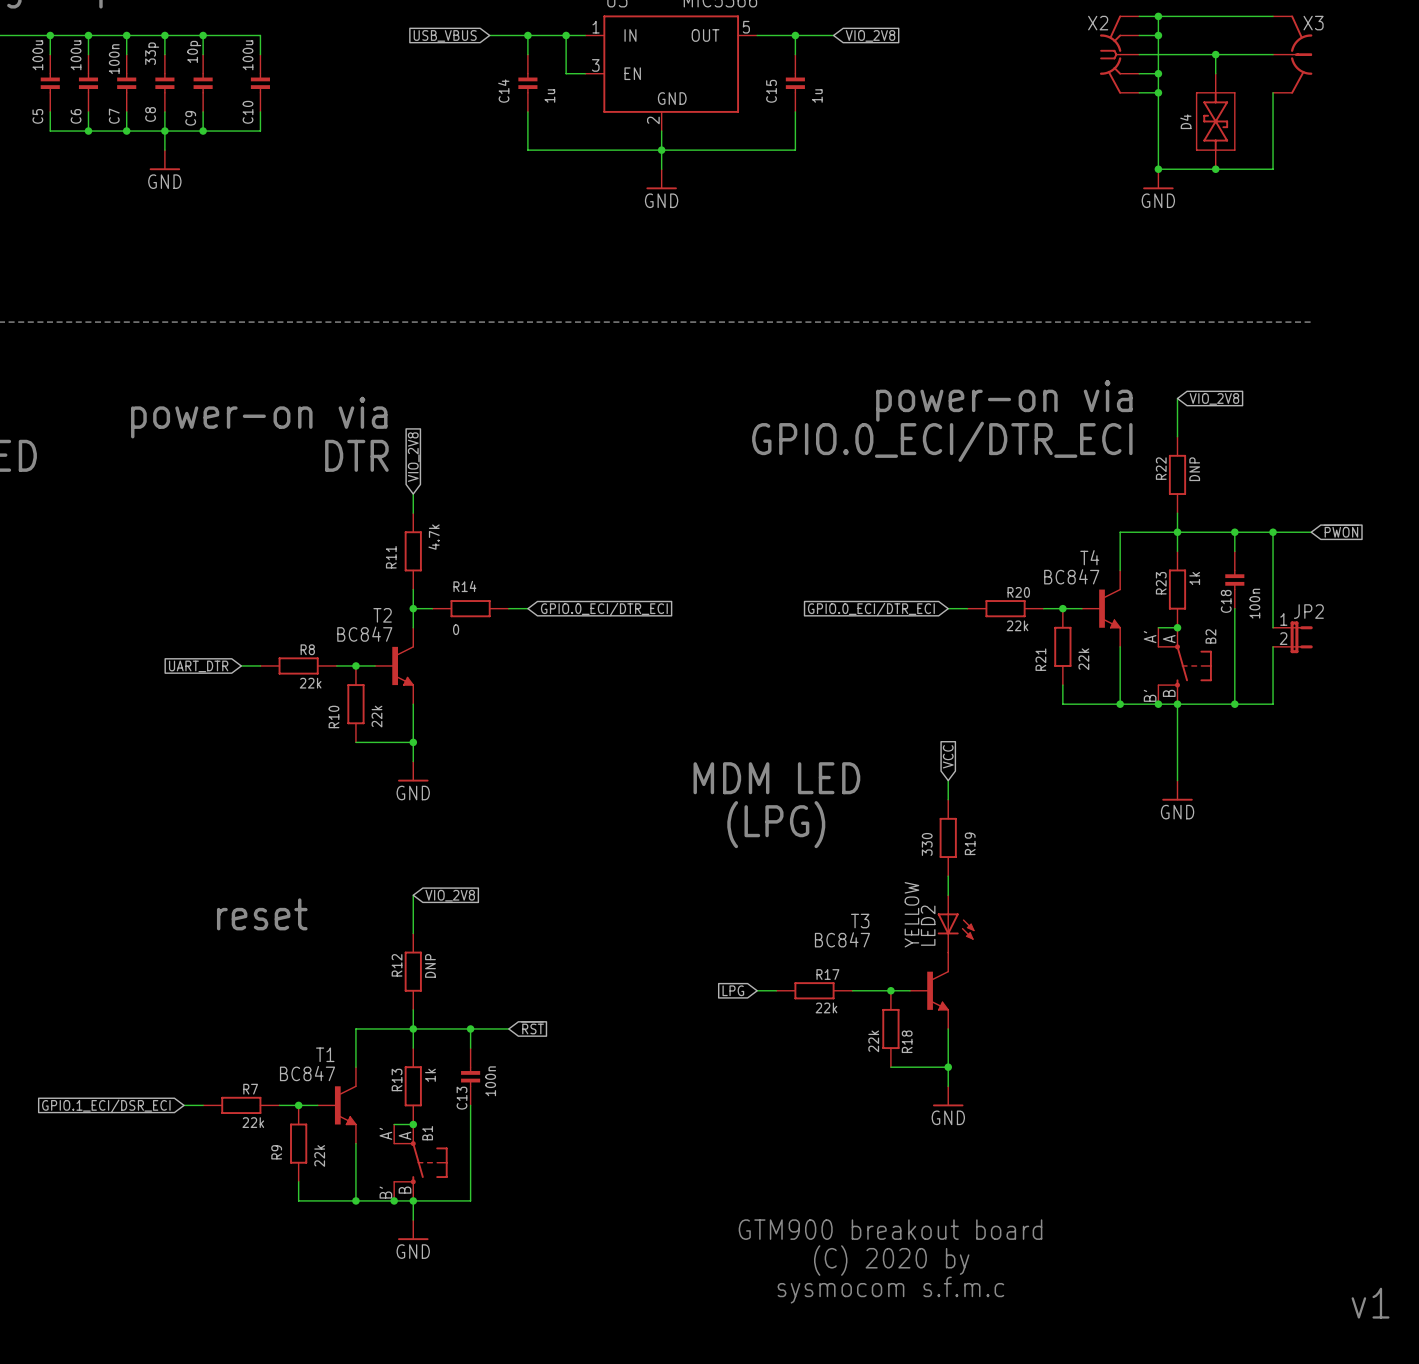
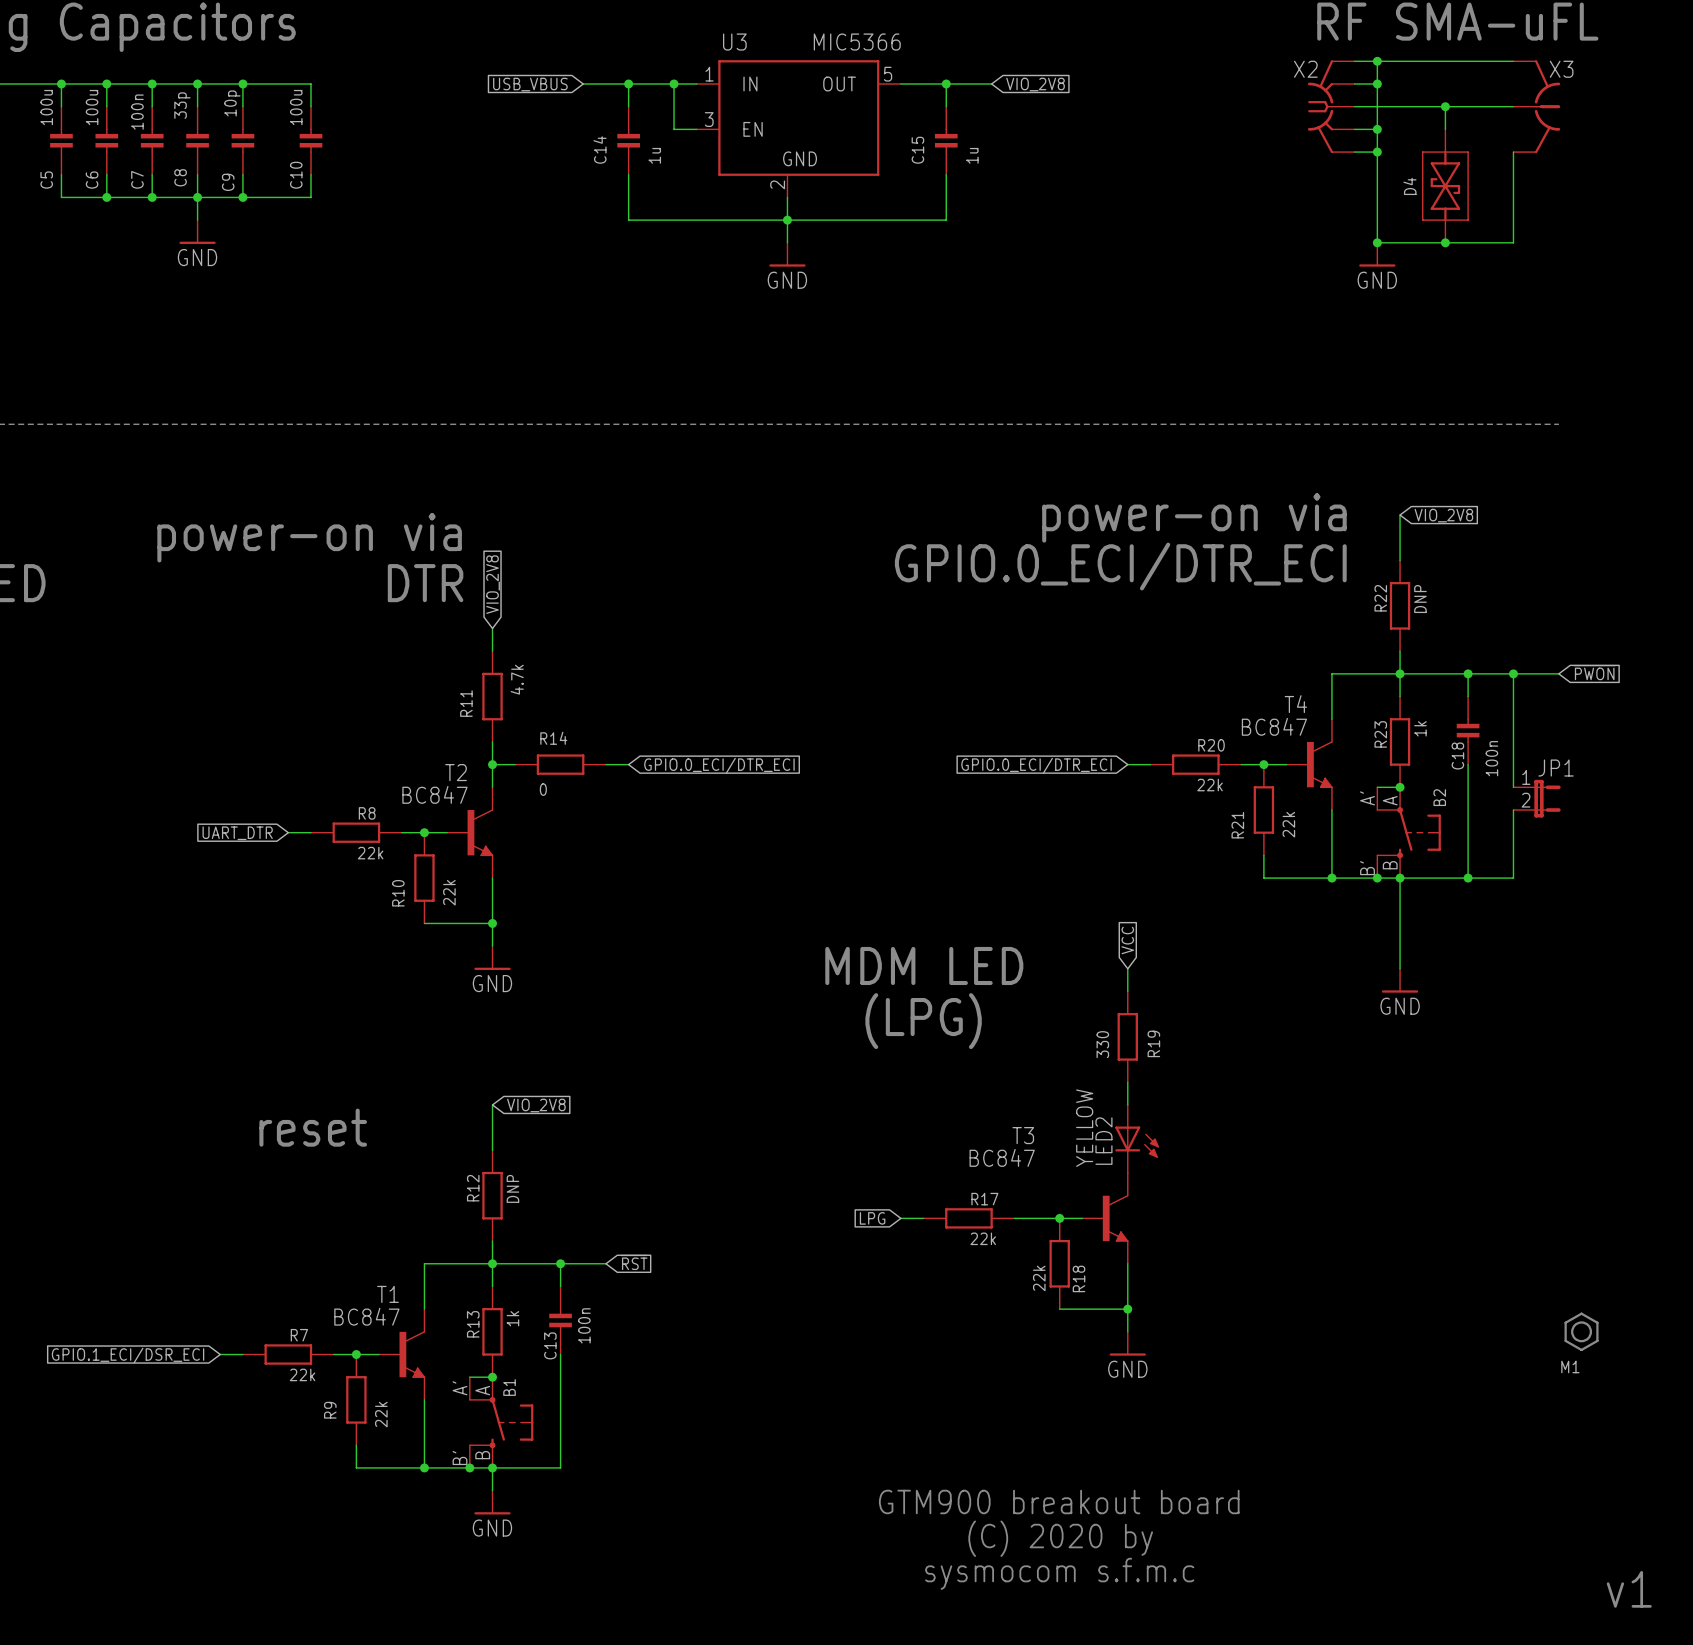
JP2 name: JP2 (1308, 611) -> JP1 (1556, 768)
M1: none -> (1581, 1331)

